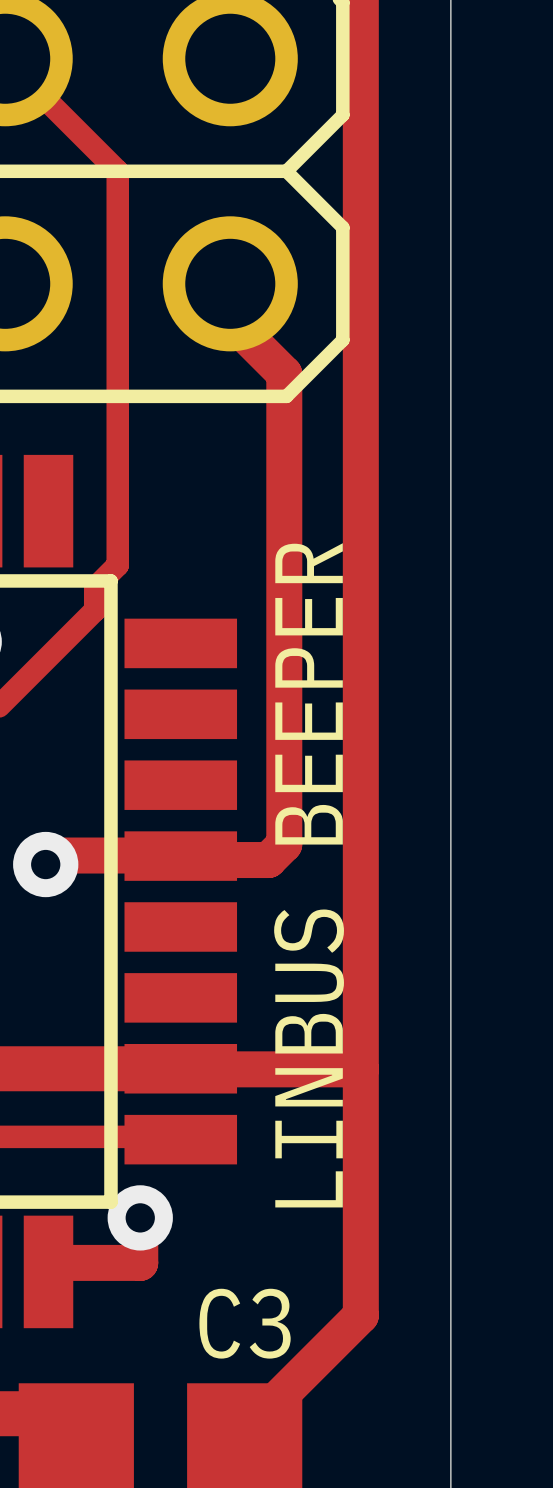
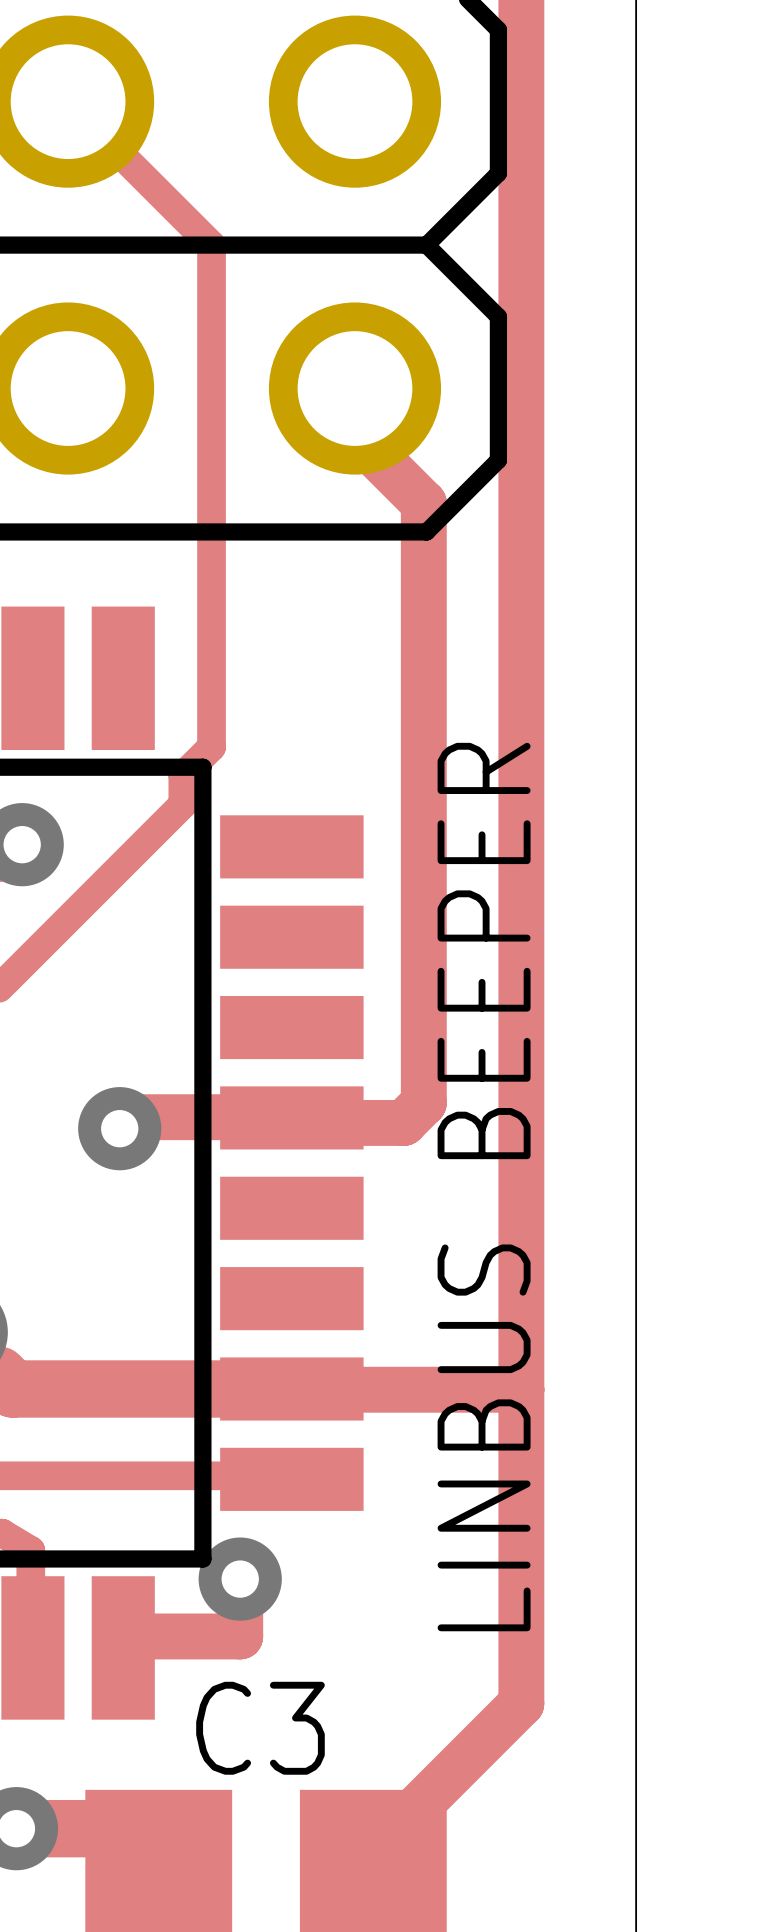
text position: LINBUS BEEPER (309, 875) -> LINBUS BEEPER (484, 1187)
C3 name position: C3 (245, 1323) -> C3 (260, 1728)

